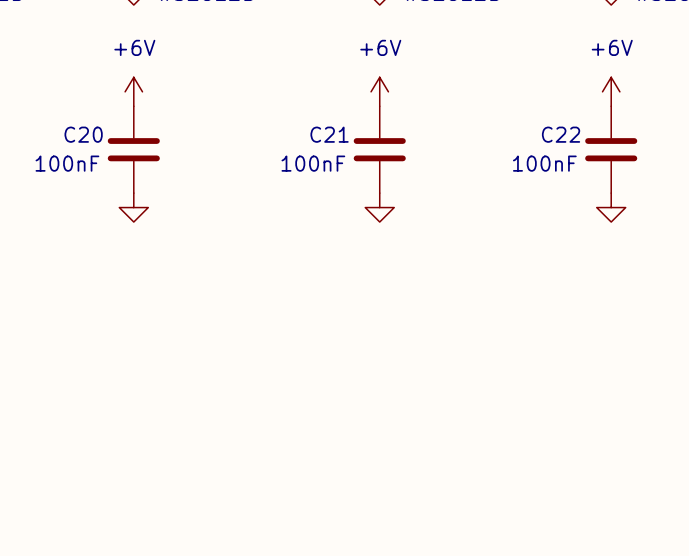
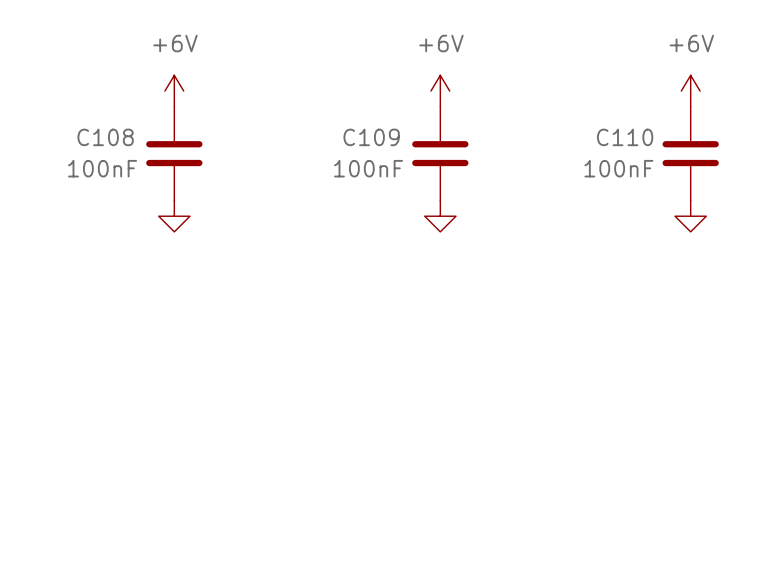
C20 name: C20 (83, 134) -> C108 (105, 137)
C21 name: C21 (329, 134) -> C109 (371, 137)
C22 name: C22 (561, 134) -> C110 (625, 137)

